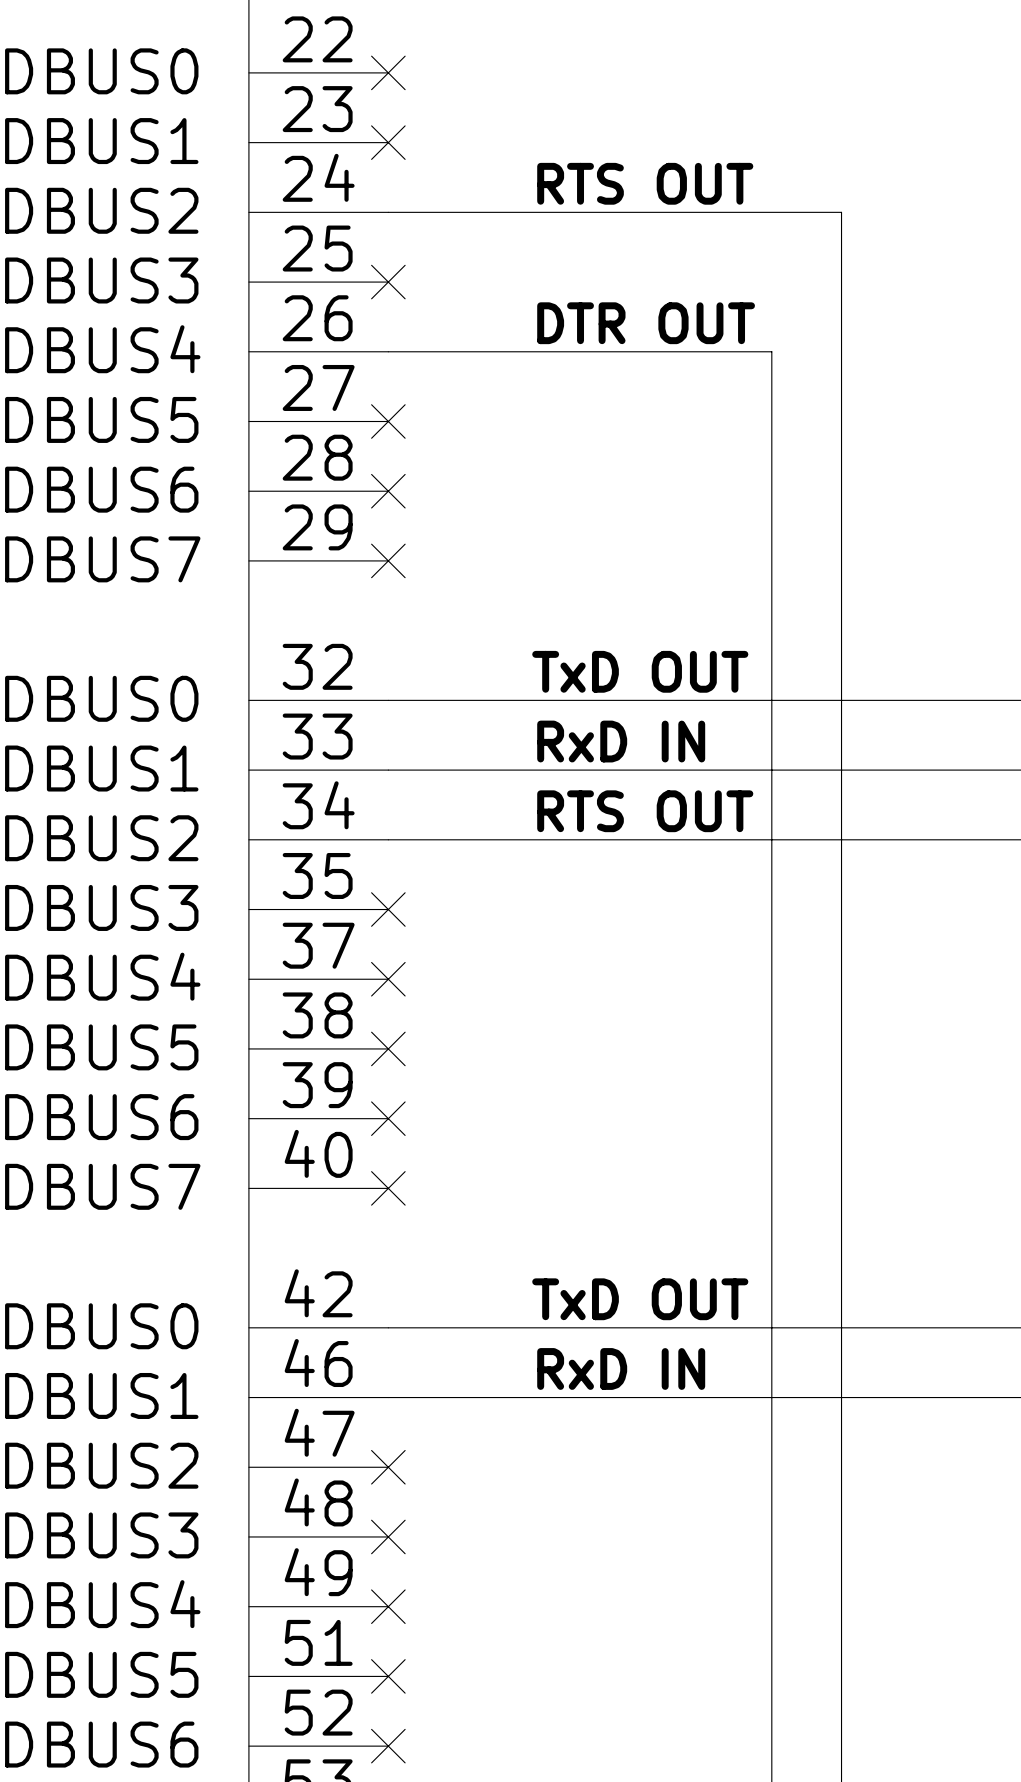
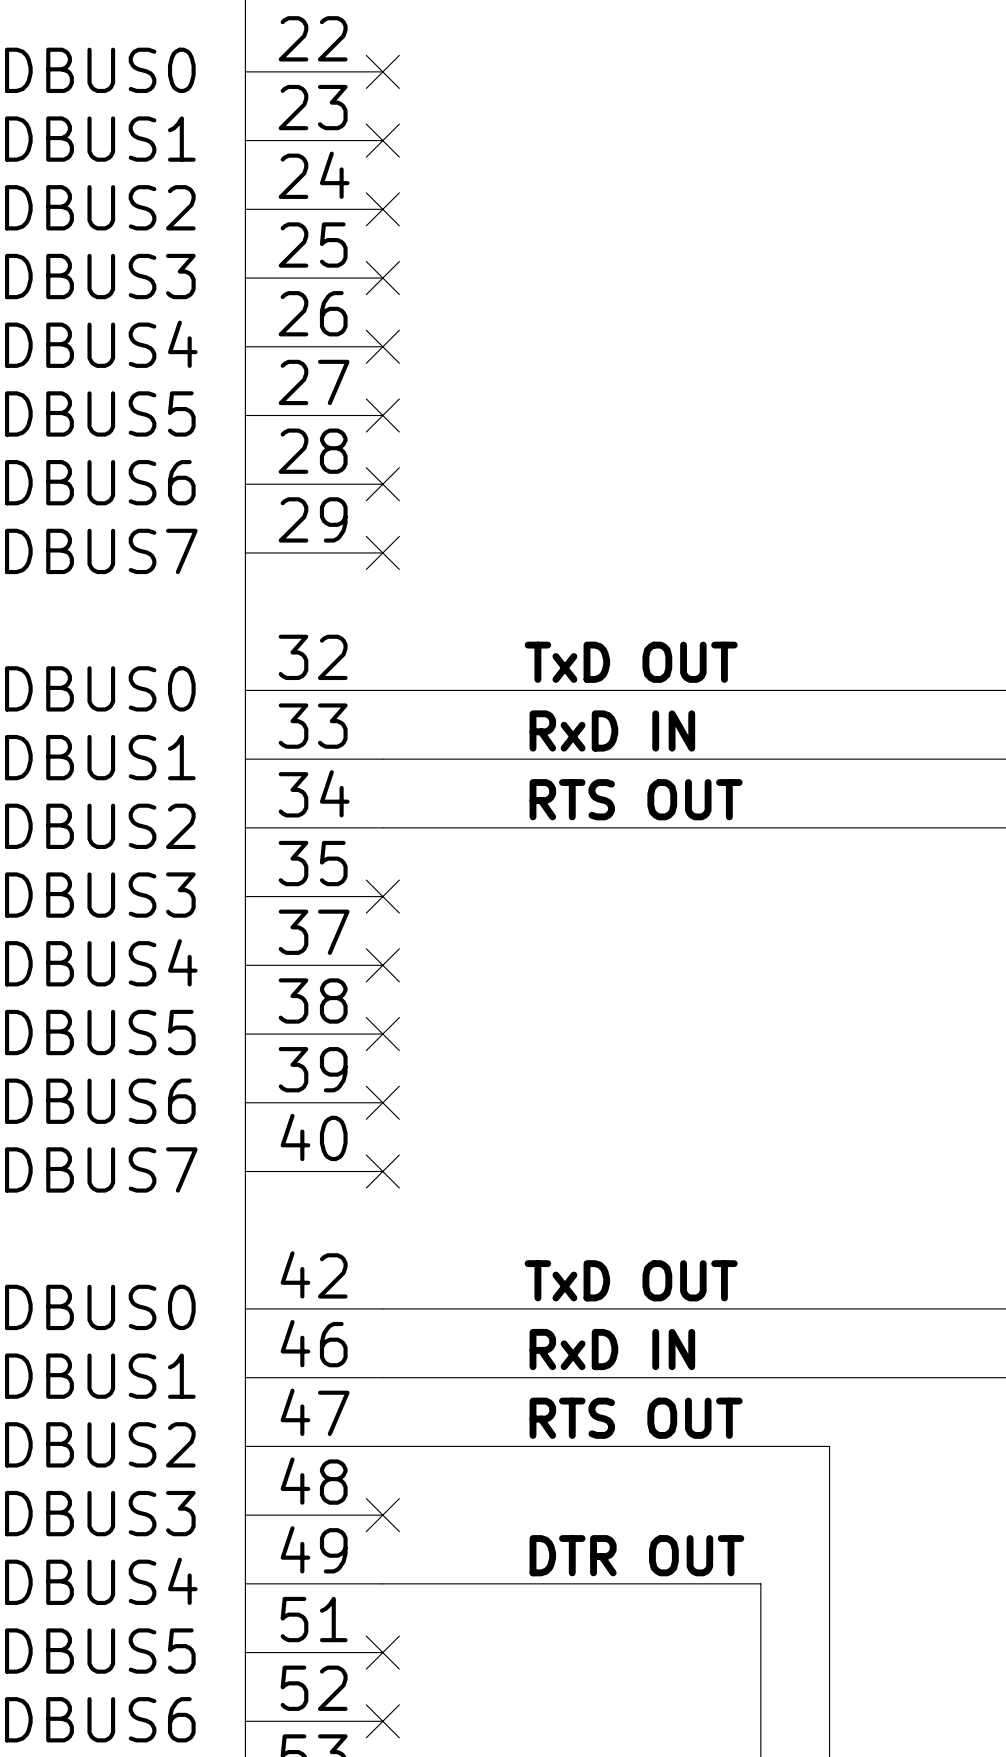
text: RTS OUT (645, 183) -> none
wire: (388, 212) (841, 212) (841, 1467) -> (382, 1446) (829, 1446)
no-connect mark: none -> (382, 209)
text: DTR OUT (646, 323) -> none
wire: (388, 351) (771, 351) (771, 1606) -> (382, 1583) (760, 1583)
no-connect mark: none -> (382, 346)
text: none -> RTS OUT (636, 1418)
no-connect mark: (388, 1467) -> none
text: none -> DTR OUT (636, 1555)
no-connect mark: (388, 1606) -> none

